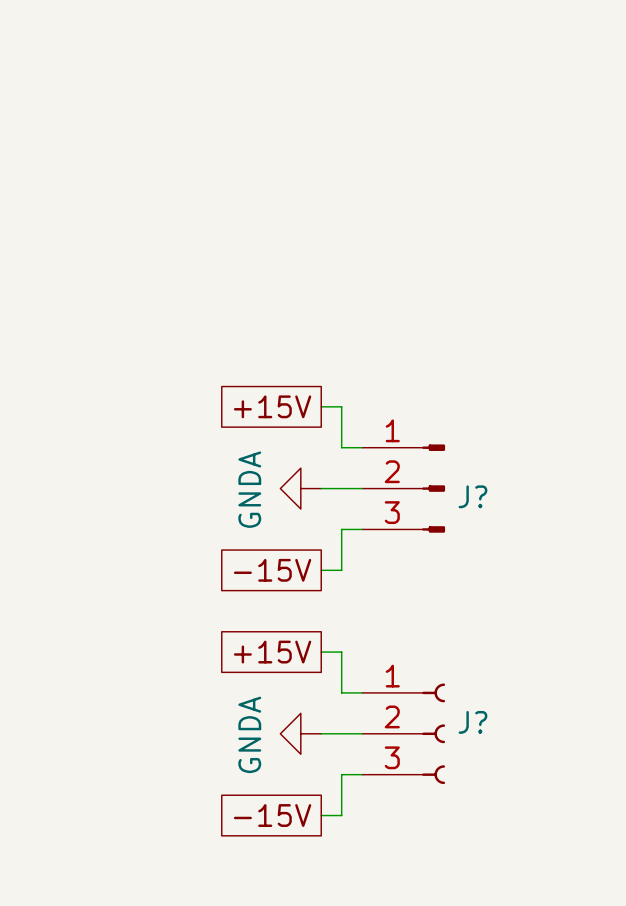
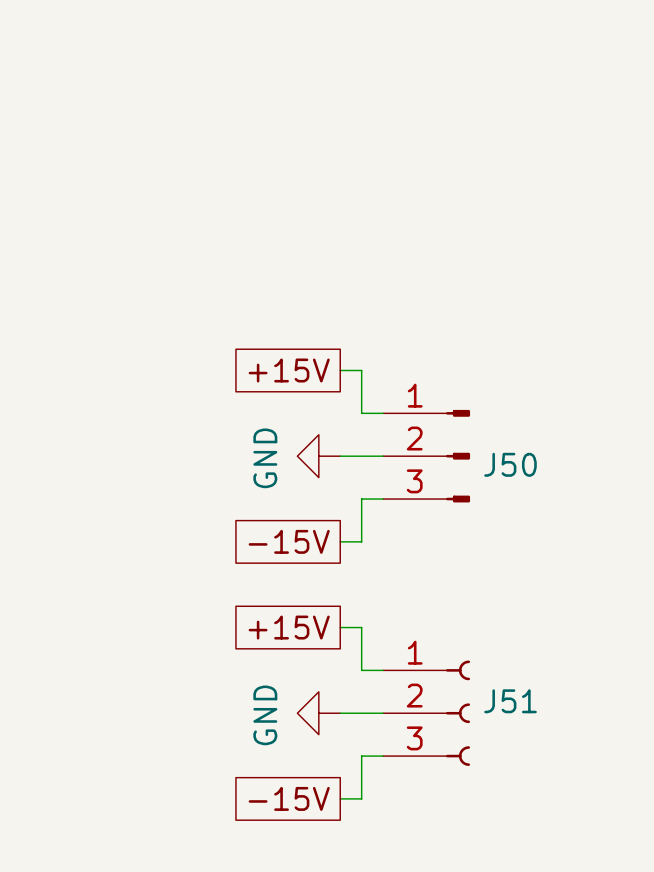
power symbol: GNDA (300, 488) -> GND (318, 456)
J? name: J? (472, 496) -> J50 (510, 464)
J? name: J? (472, 722) -> J51 (510, 701)
power symbol: GNDA (300, 733) -> GND (318, 713)

